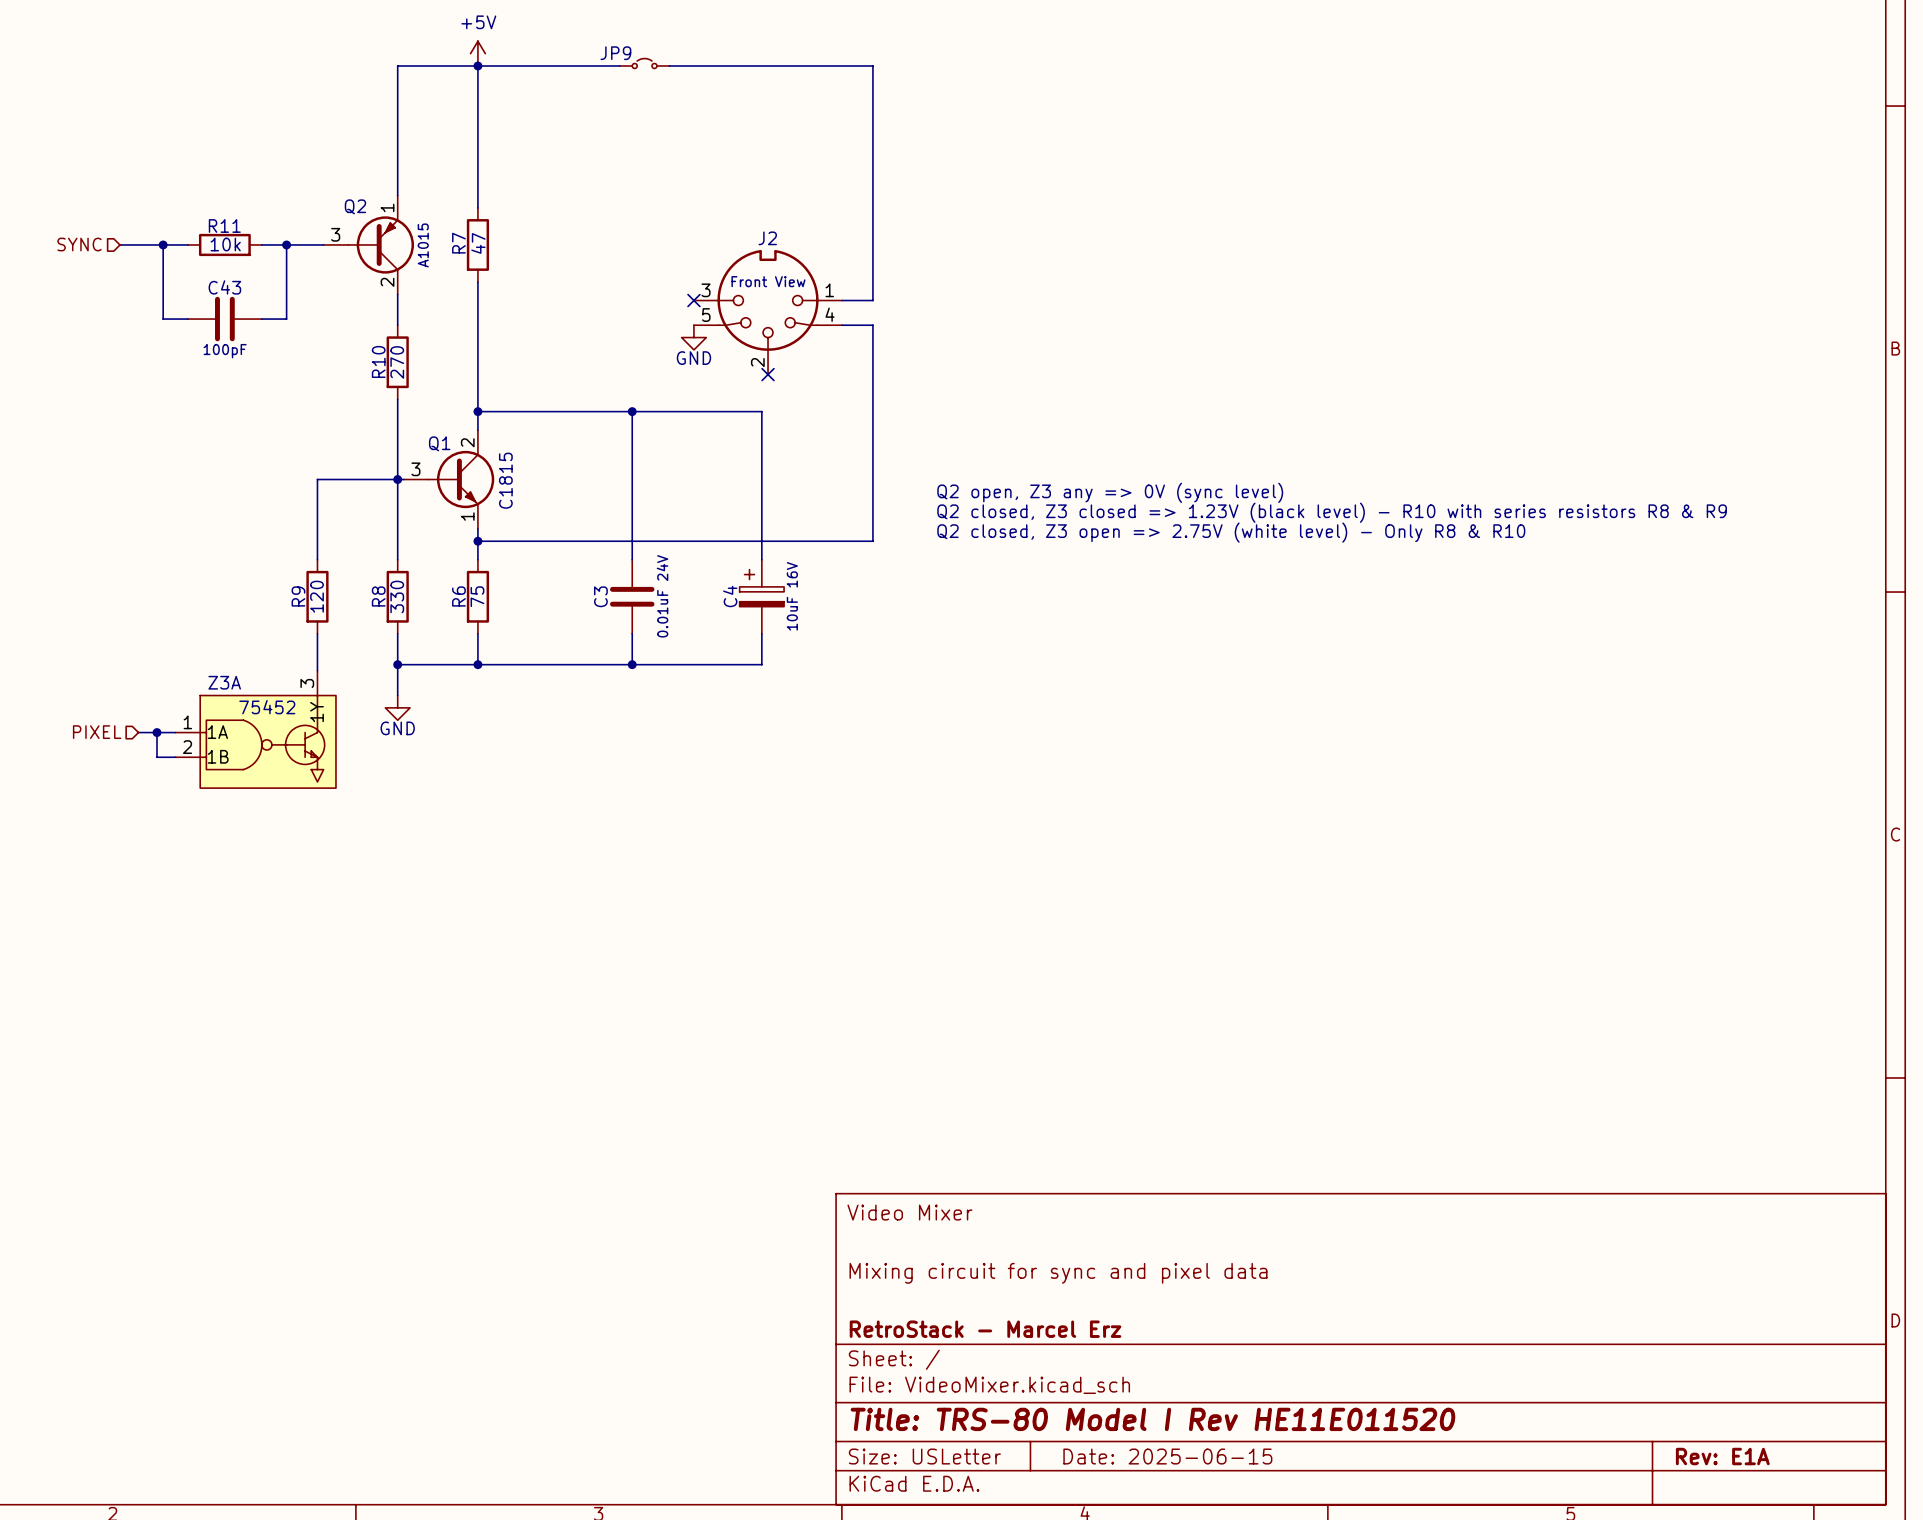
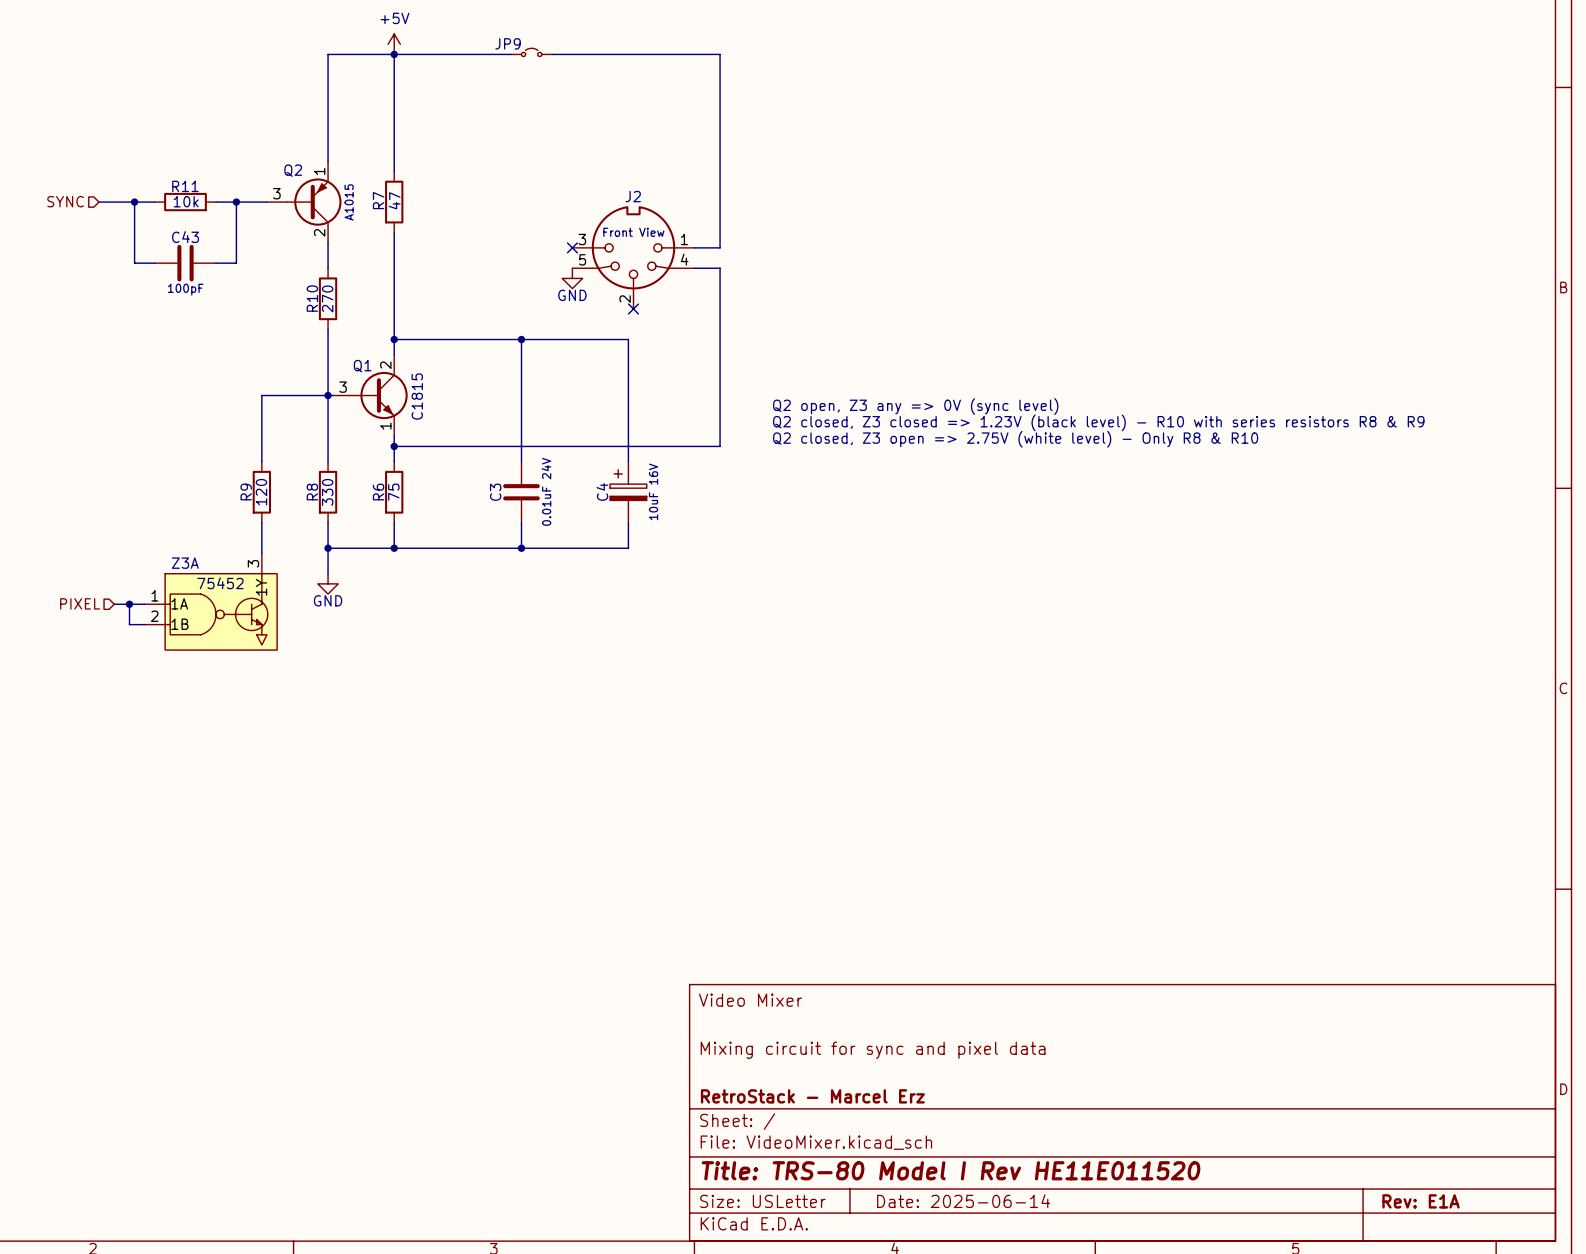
title block: Date: 2025-06-15 (1167, 1456) -> Date: 2025-06-14 (963, 1201)

